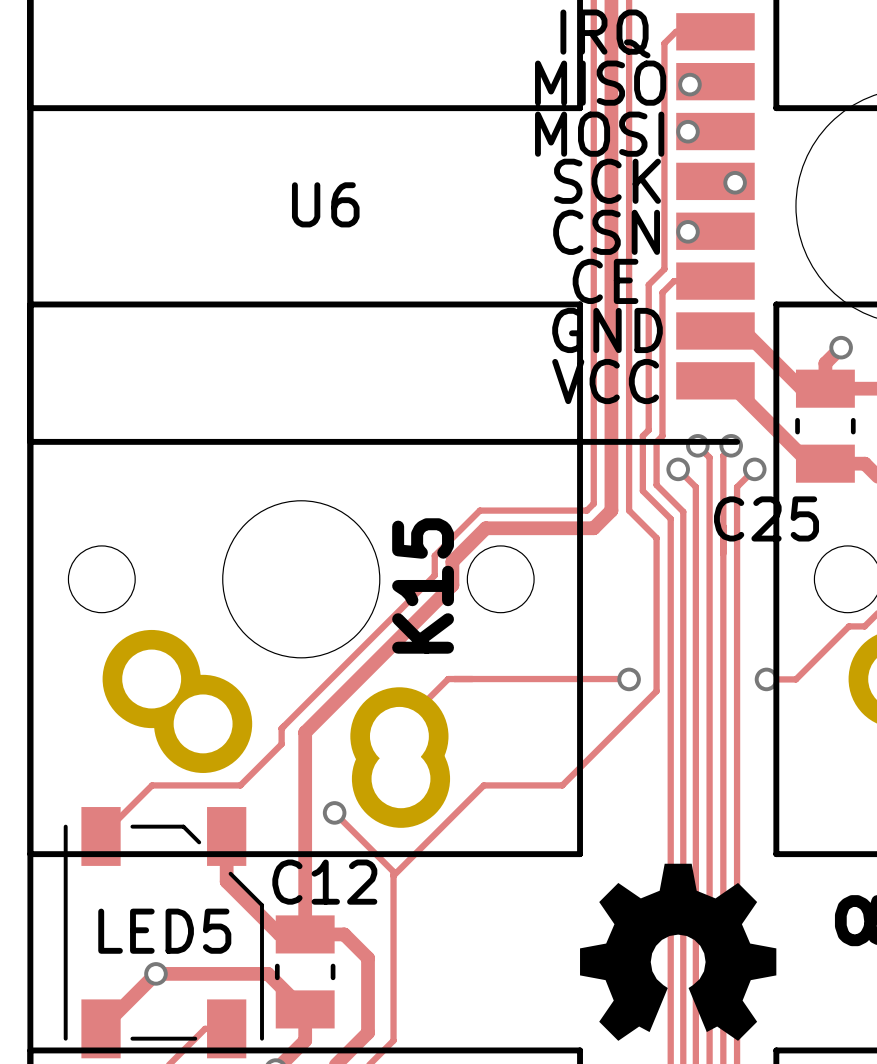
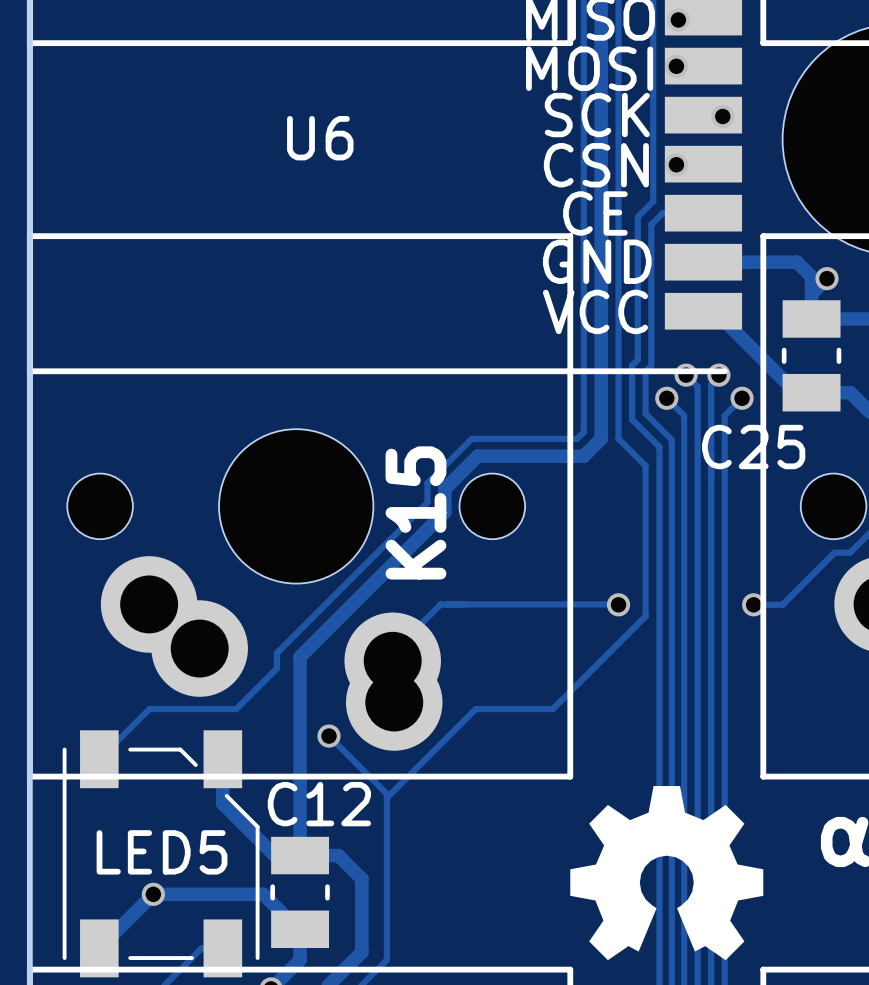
track: (743, 330) (801, 388) (825, 388) -> (731, 262) (797, 262) (811, 276) (811, 294)

